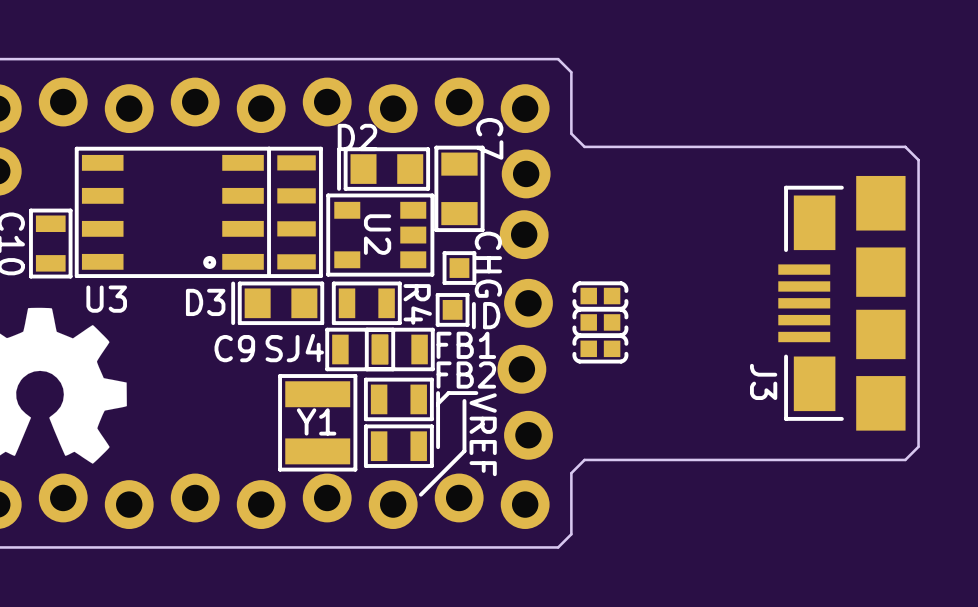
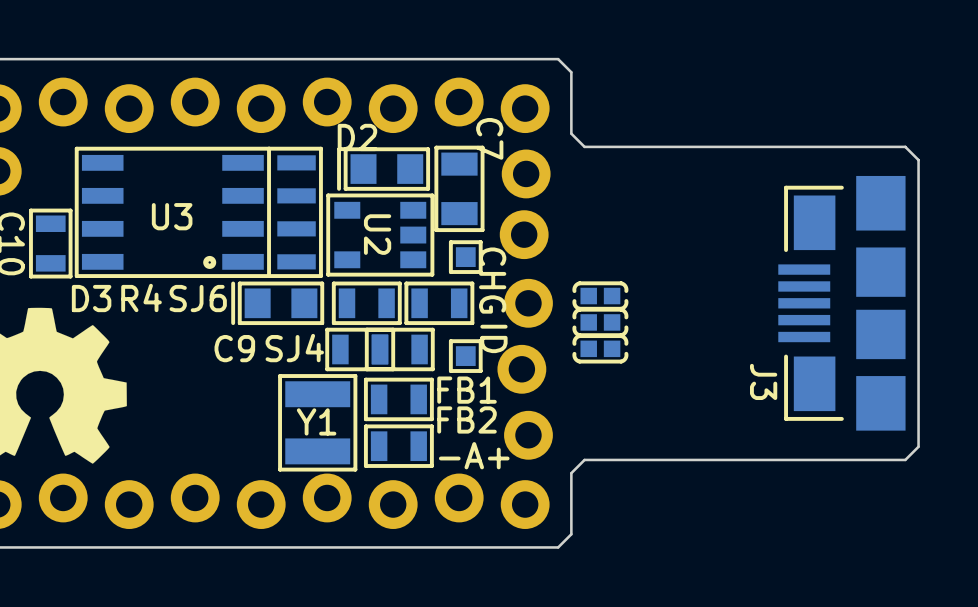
part value position: CHG (488, 264) -> CHG (492, 280)
part position: (459, 268) -> (465, 257)
U3 name position: U3 (106, 299) -> U3 (172, 216)
D3 name position: D3 (205, 302) -> D3 (91, 298)
SJ6: none -> (439, 303)
R4 name rotation: 0° (417, 304) -> 90° counterclockwise (141, 297)
R4 name position: R4 (417, 304) -> R4 (141, 297)
part position: (452, 309) -> (465, 356)
part value rotation: 0° (486, 315) -> 90° clockwise (493, 338)
FB1 name position: FB1 (466, 345) -> FB1 (467, 390)
FB2 name position: FB2 (466, 375) -> FB2 (467, 419)
line: (438, 393) (438, 447) -> none
line: (476, 393) (448, 393) (438, 403) -> none
line: (464, 400) (464, 451) (420, 494) -> none
text: VREF (483, 434) -> -A+ (474, 455)

